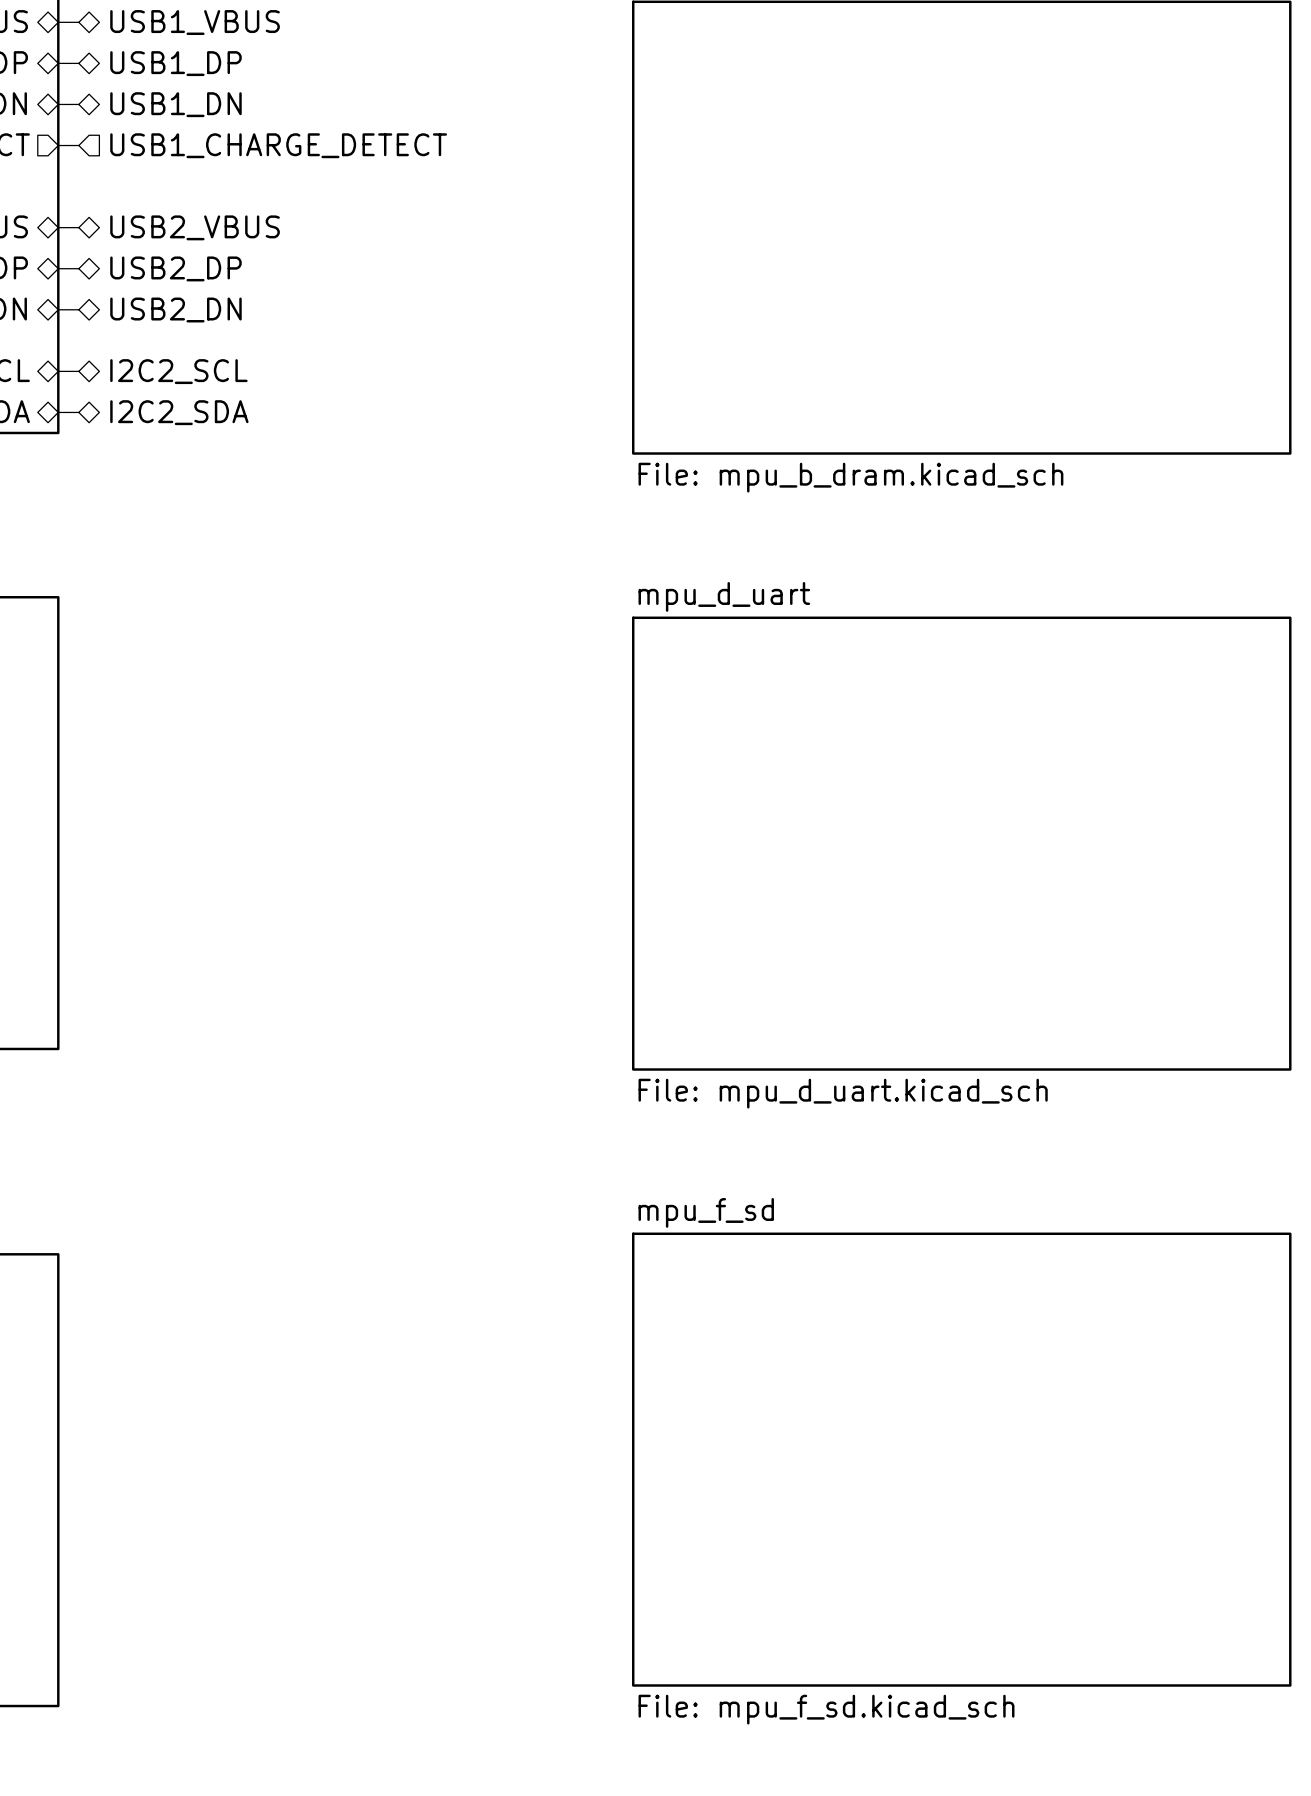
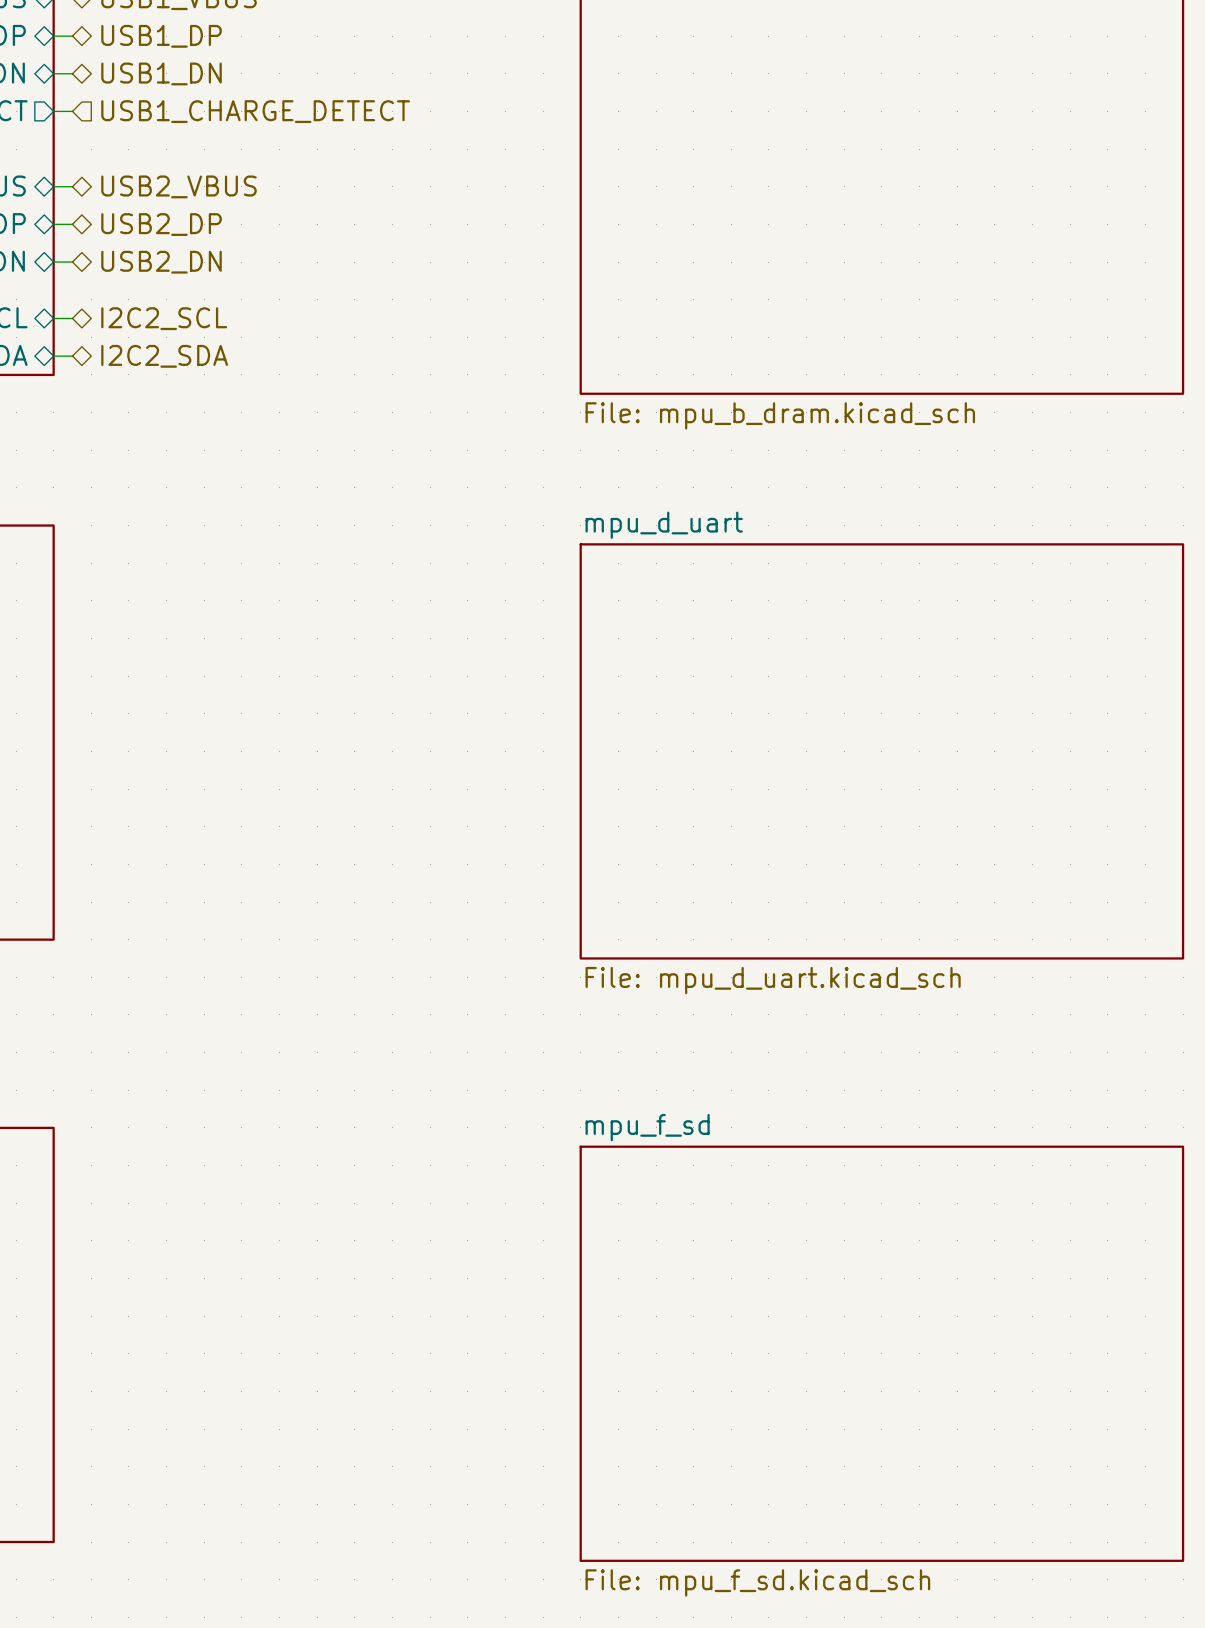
sheet mpu_f_sd position: (961, 1459) -> (881, 1353)

